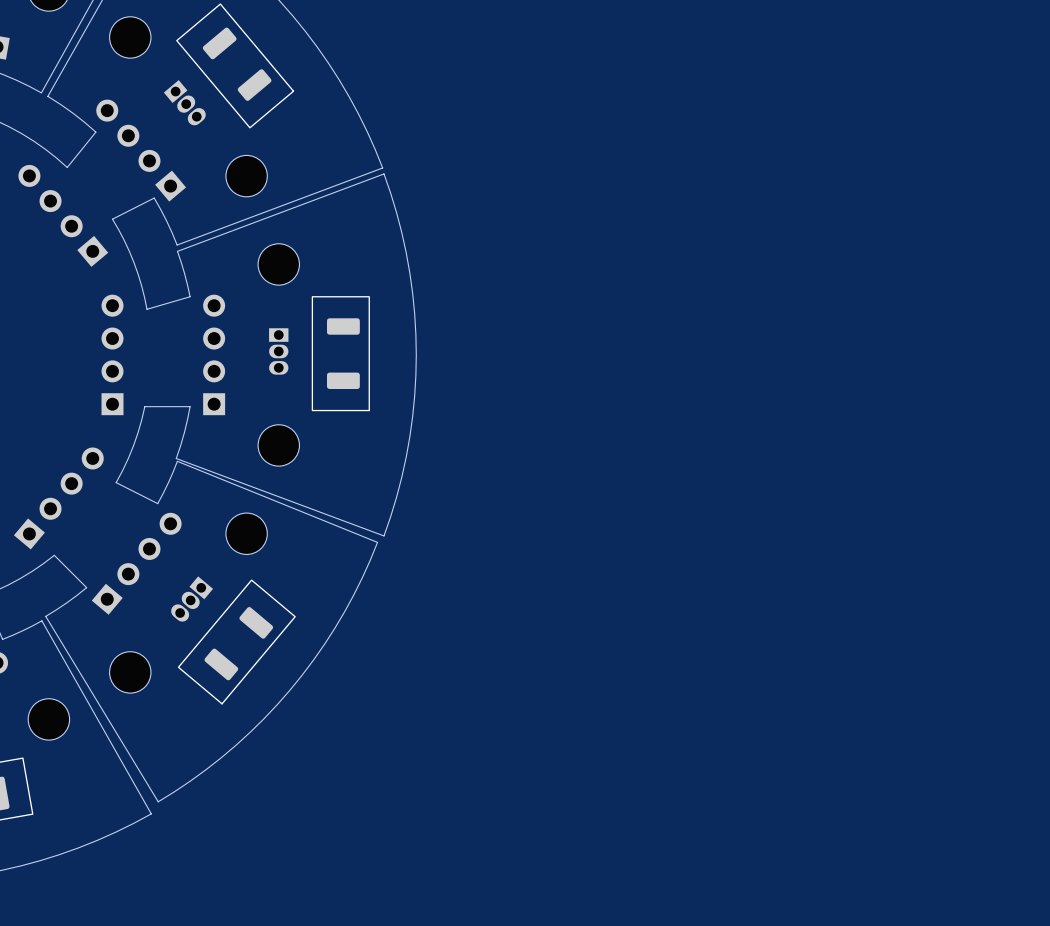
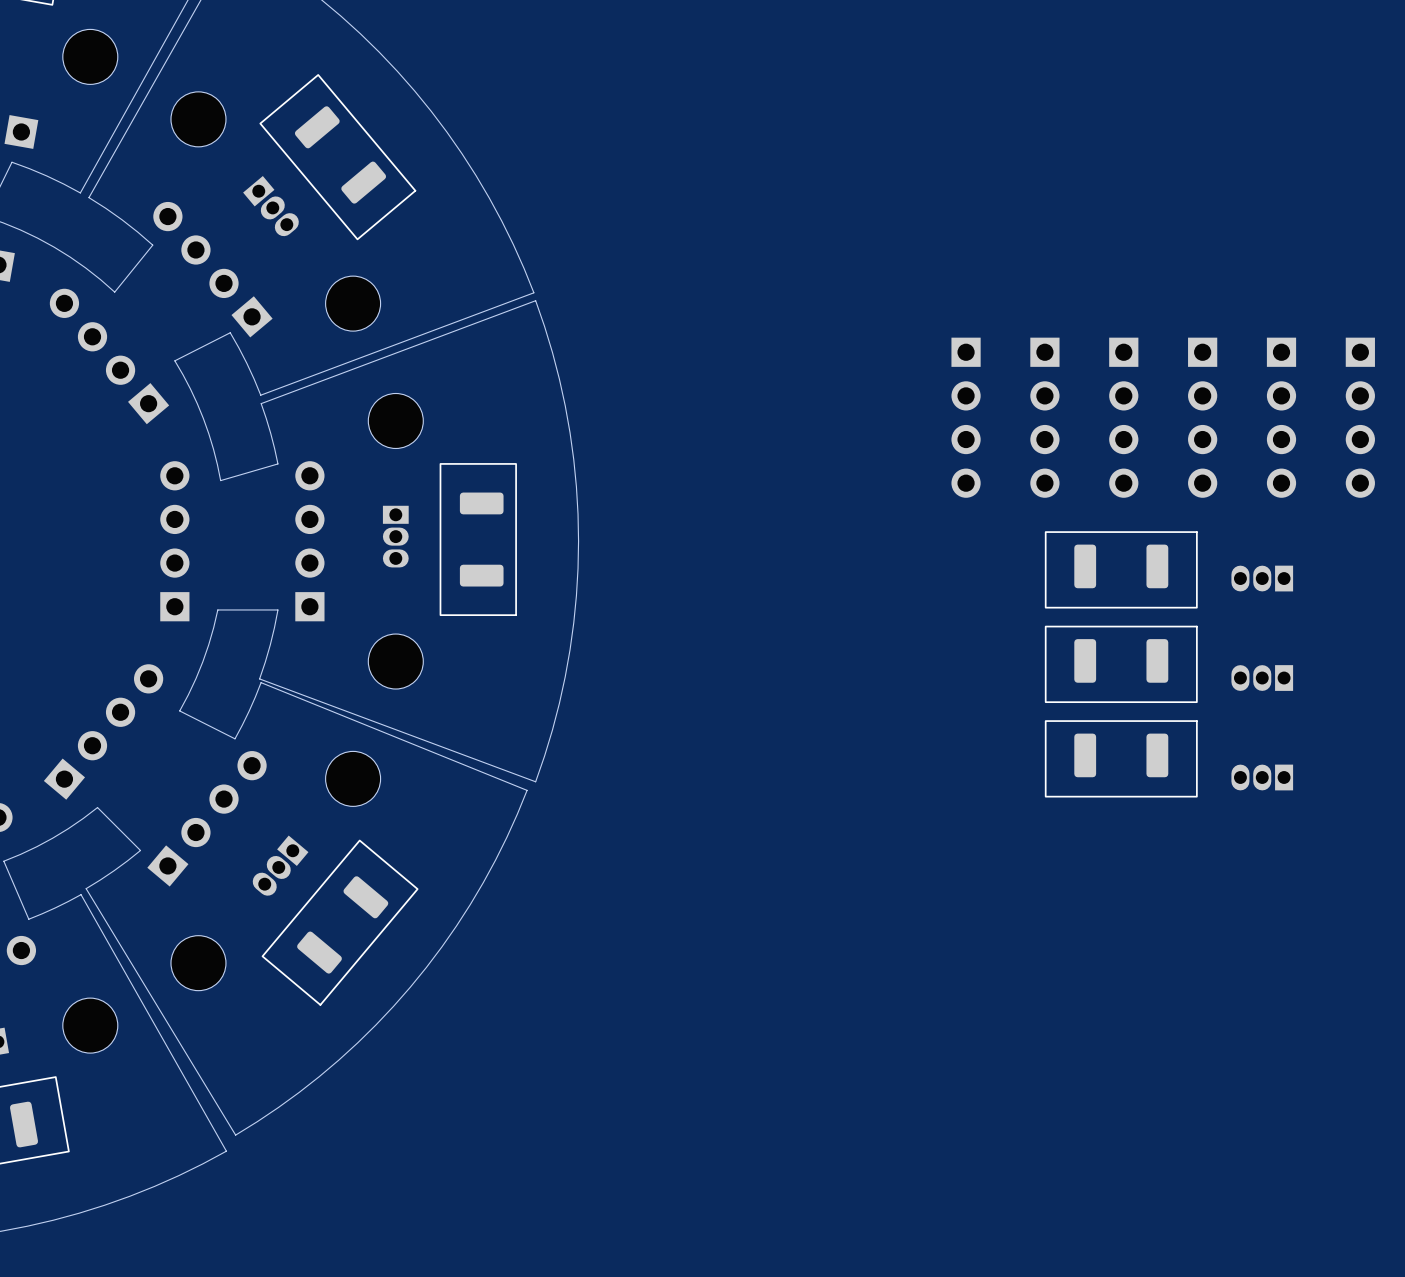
part: none -> (966, 417)
part: none -> (1044, 417)
part: none -> (1123, 417)
part: none -> (1202, 417)
part: none -> (1281, 417)
part: none -> (1360, 417)
part: none -> (1121, 569)
part: none -> (1262, 578)
part: none -> (1121, 664)
part: none -> (1262, 678)
part: none -> (1121, 758)
part: none -> (1262, 777)

